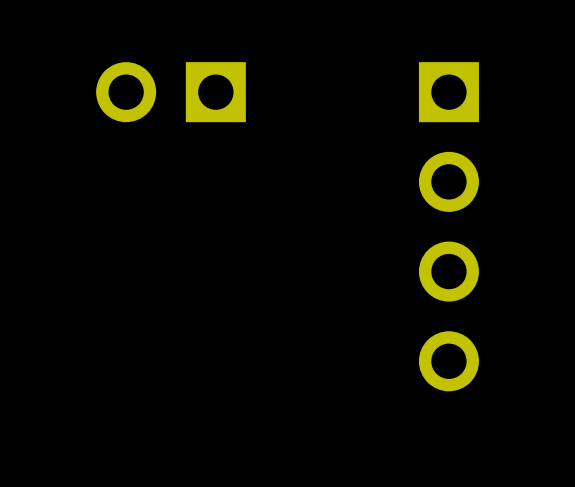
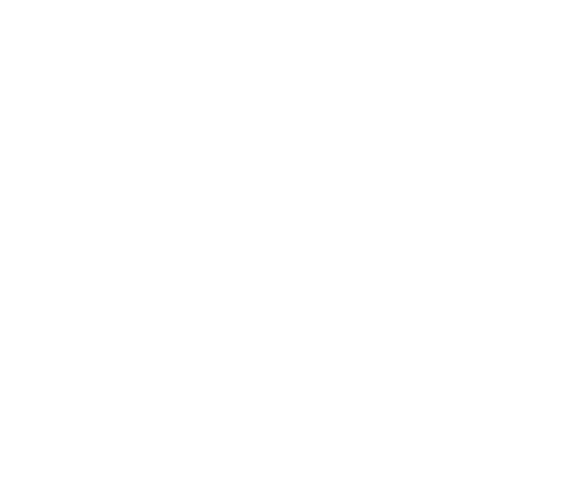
part: (170, 92) -> none
part: (448, 226) -> none

